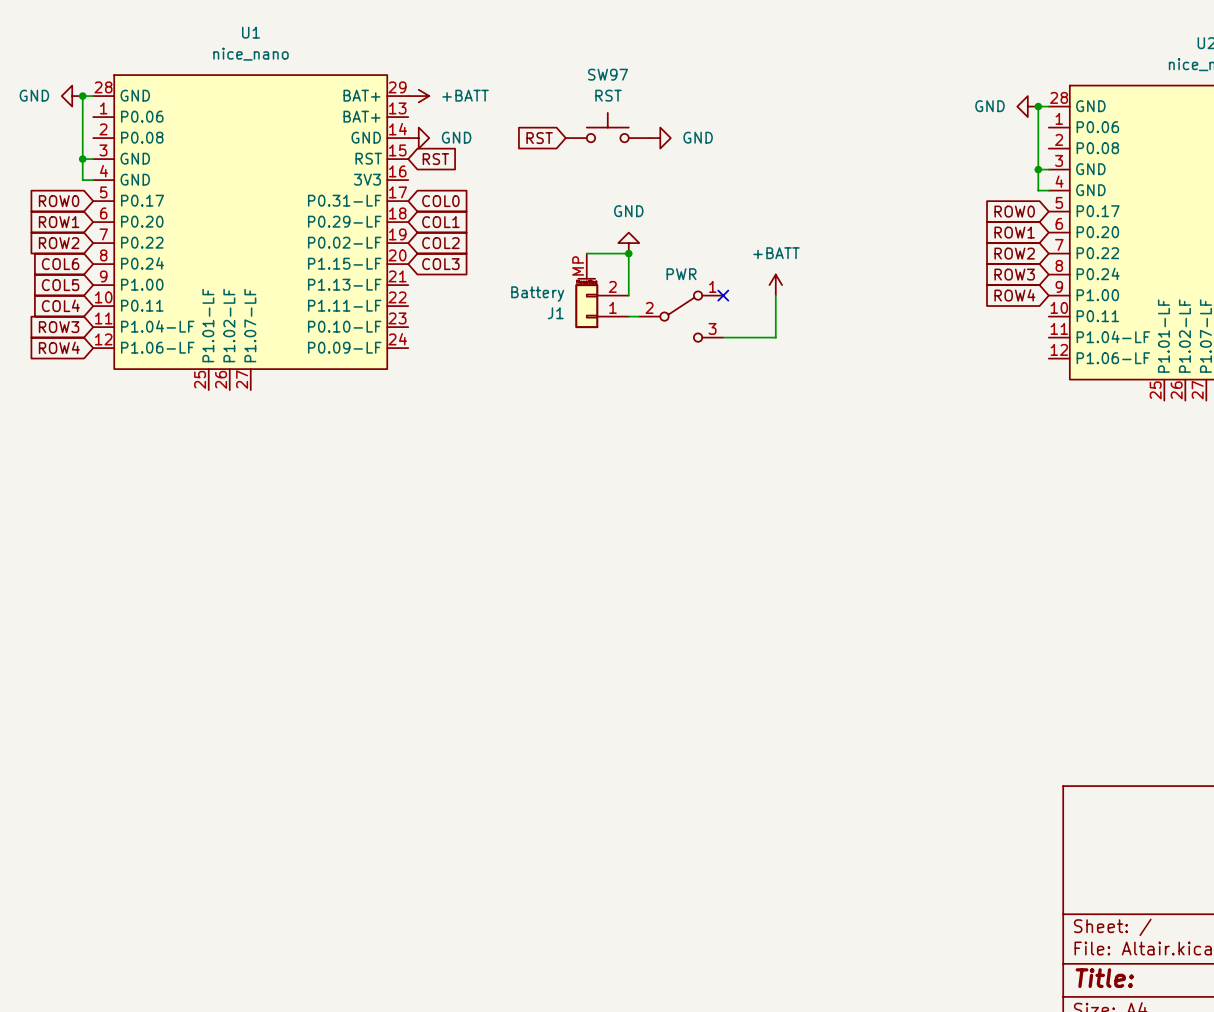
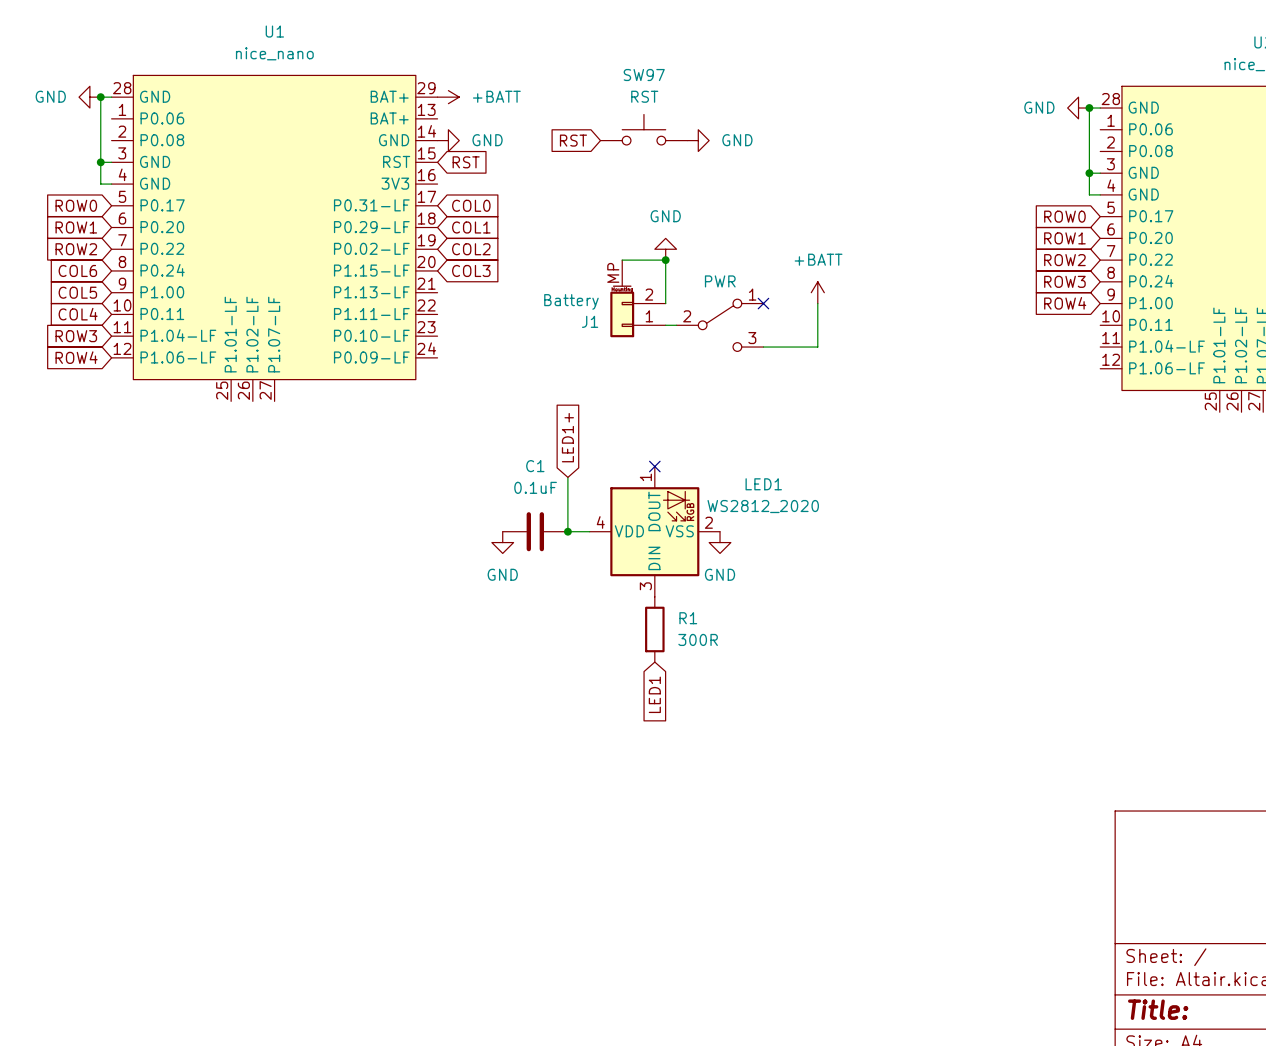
global label: none -> LED1+ (567, 437)
no-connect mark: none -> (654, 466)
wire: none -> (567, 477) (567, 531) (589, 531)
C1: none -> 0.1uF (535, 531)
junction: none -> (567, 531)
LED1: none -> WS2812_2020 (654, 531)
power symbol: none -> GND (502, 542)
power symbol: none -> GND (720, 542)
R1: none -> 300R (654, 629)
global label: none -> LED1 (654, 694)

